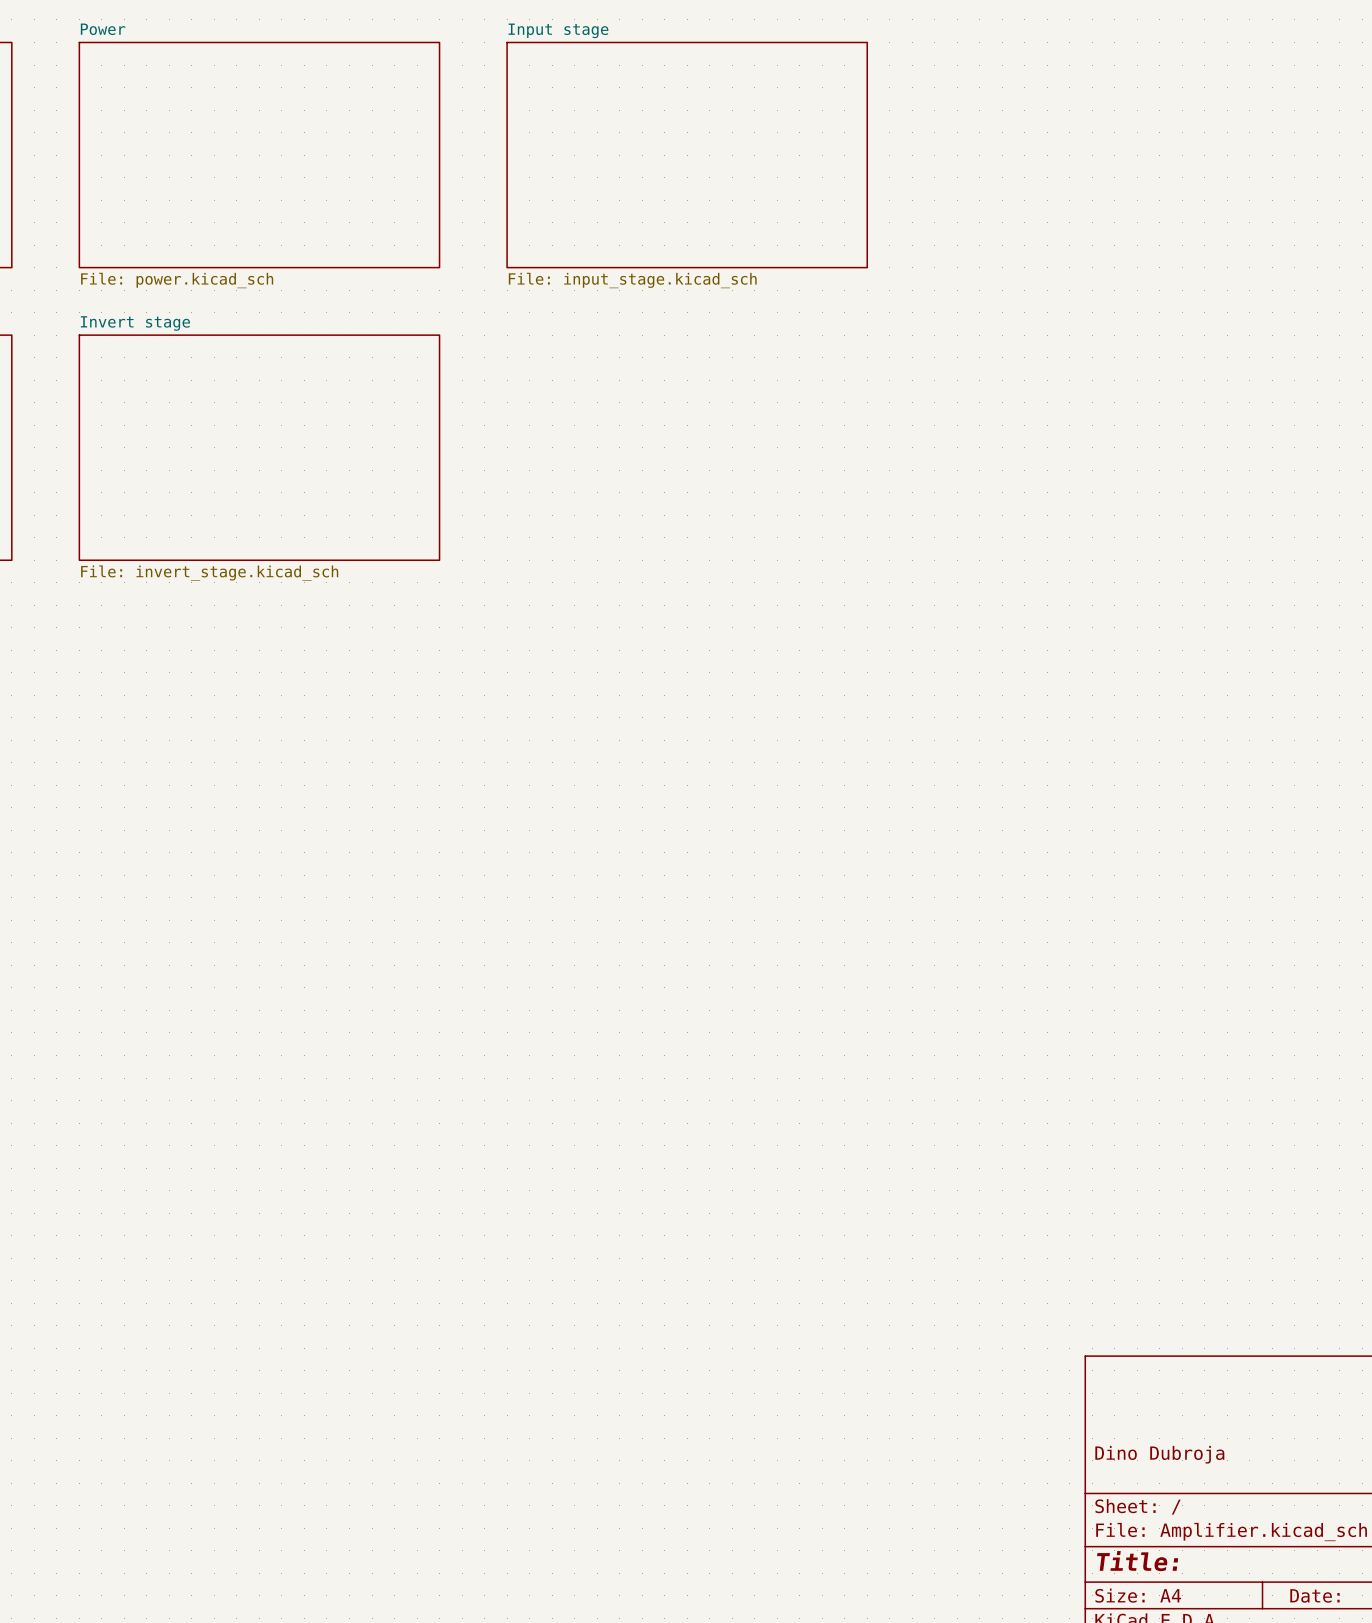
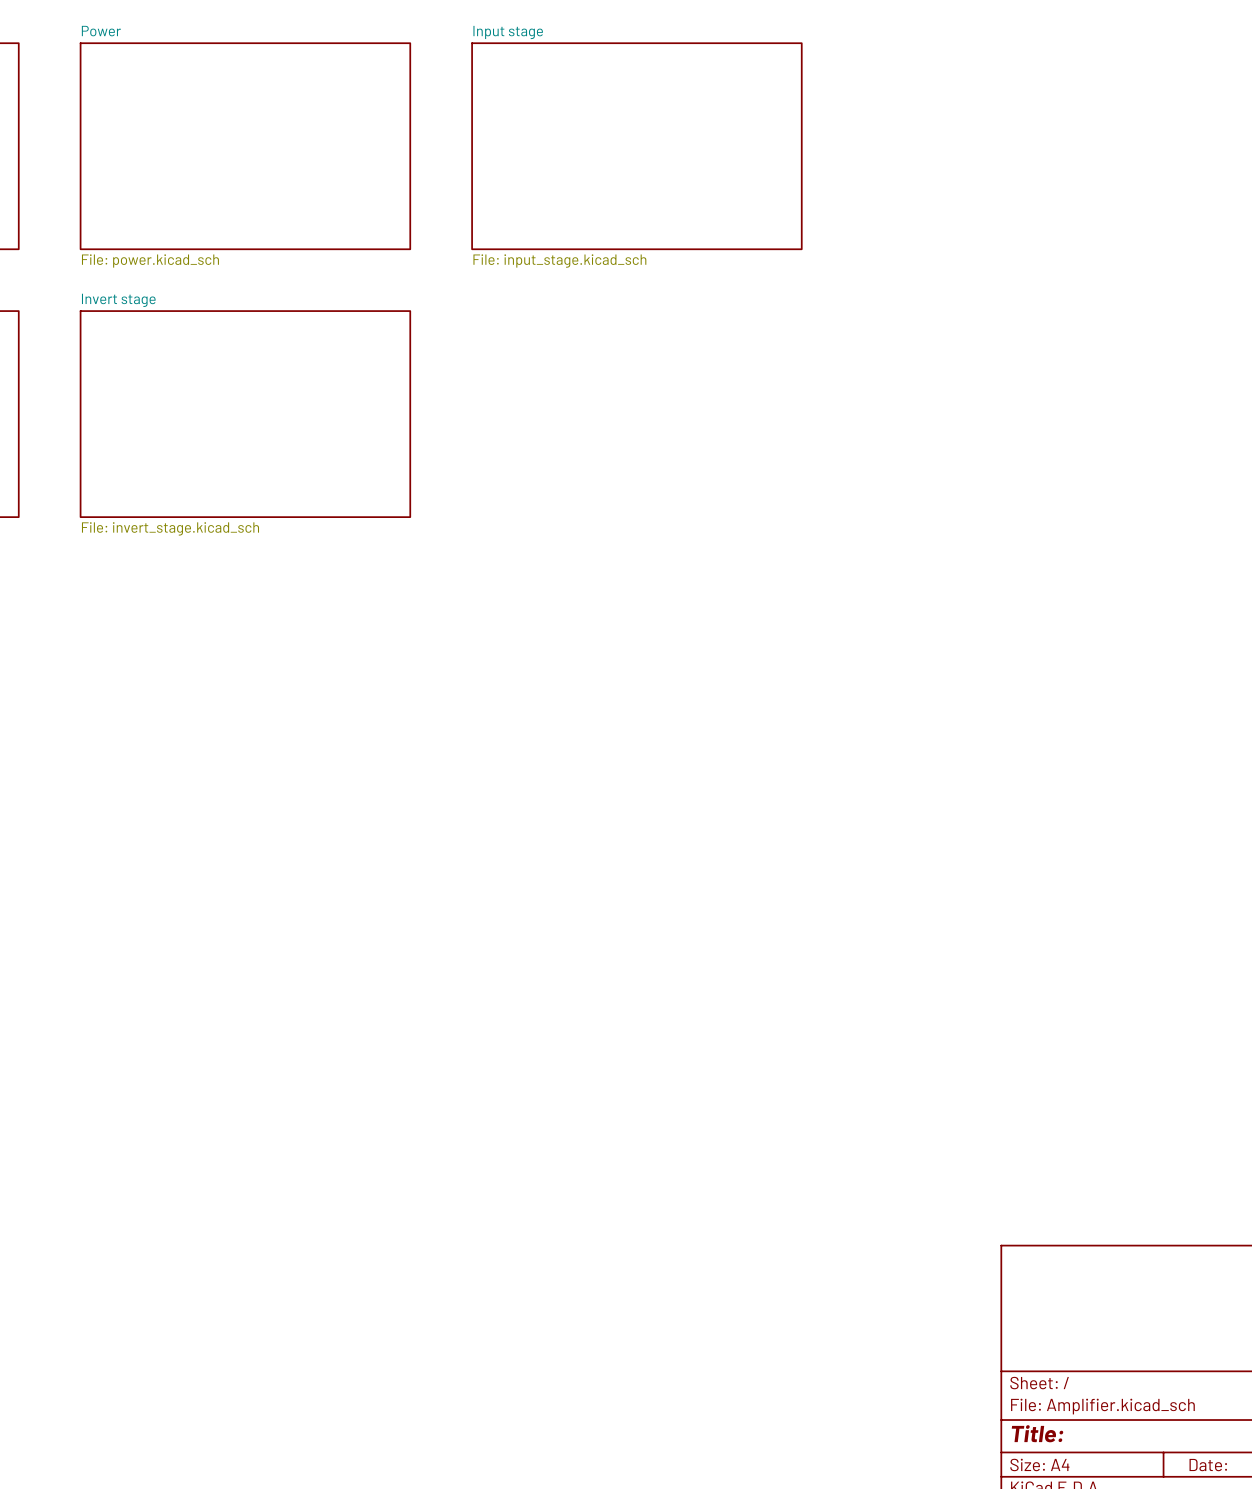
title block: Dino Dubroja (1159, 1454) -> none

